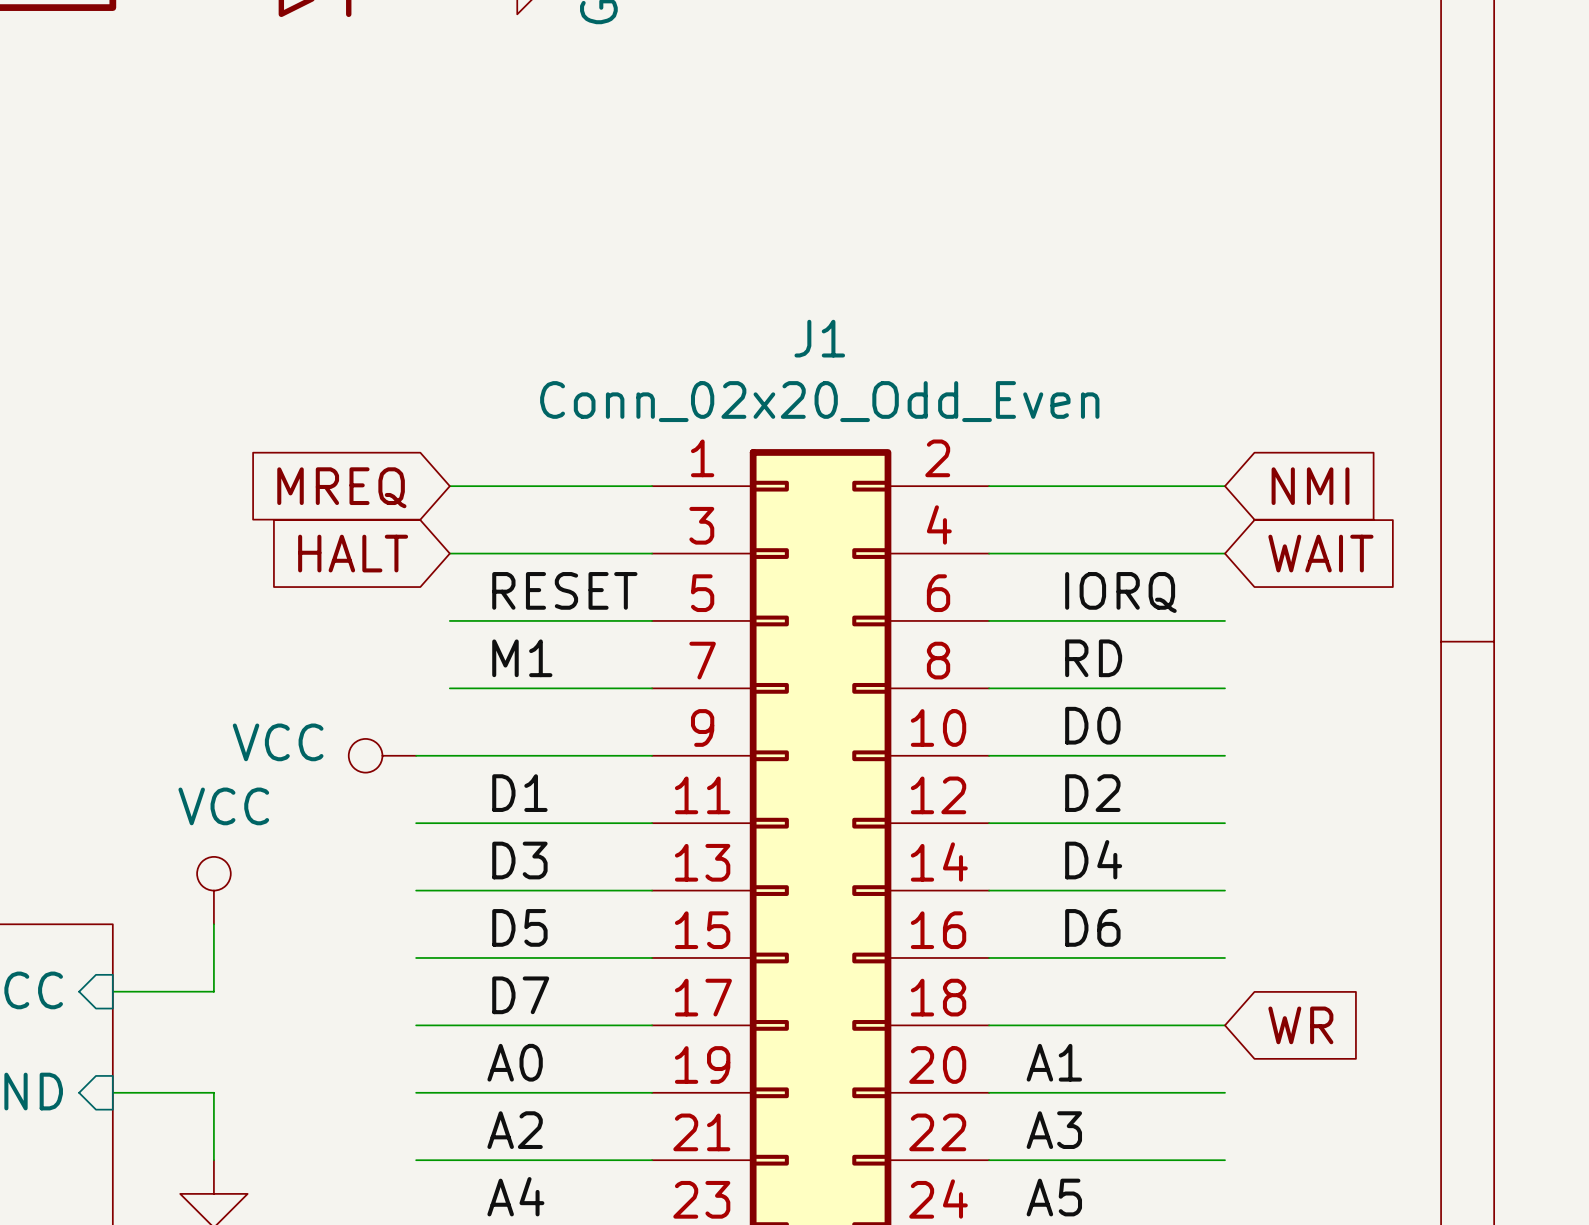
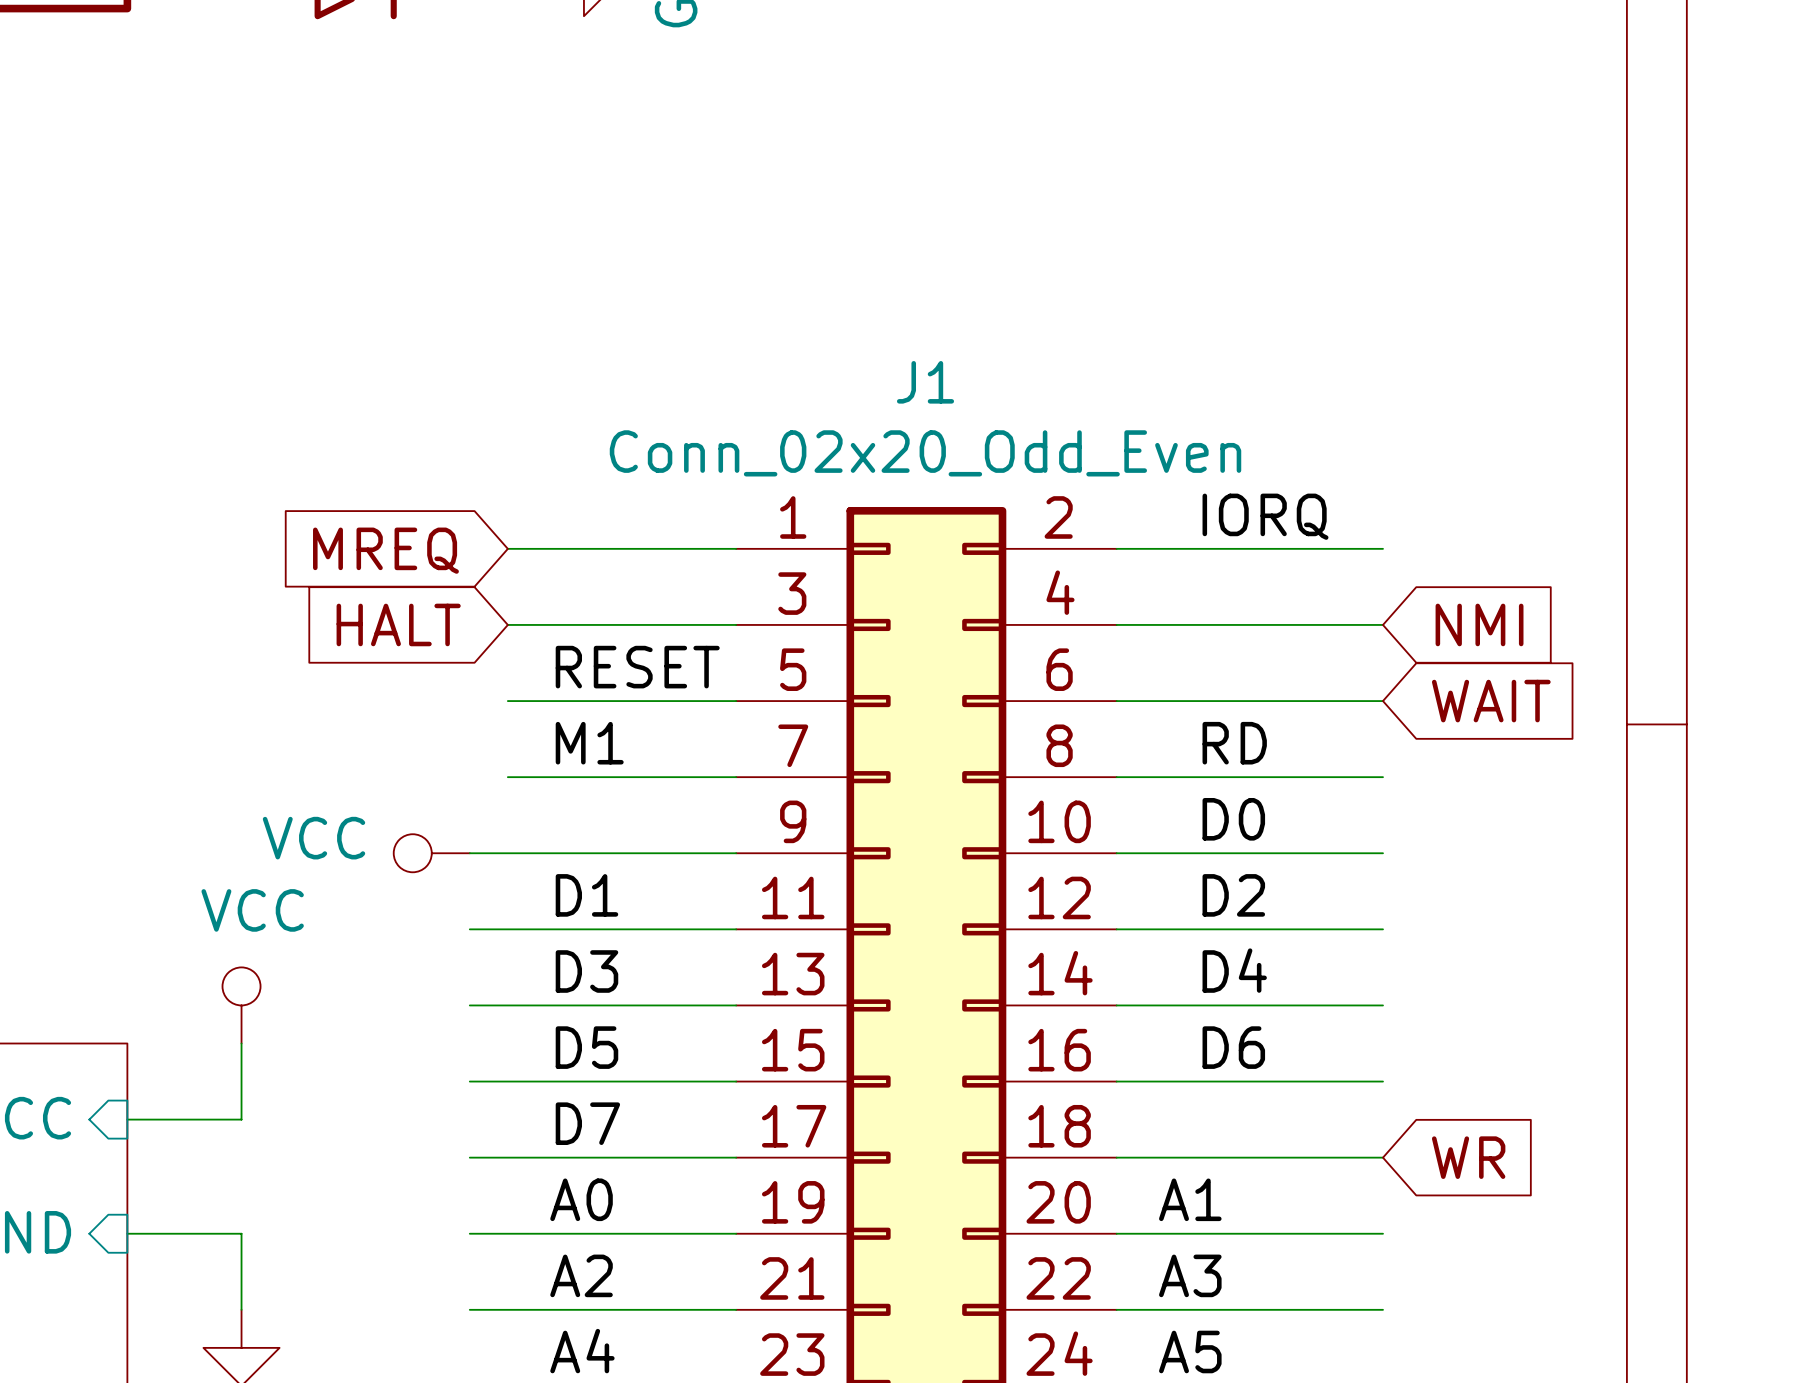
global label: NMI (1310, 486) -> none
global label: WAIT (1320, 553) -> NMI (1479, 624)
label position: IORQ (1120, 592) -> IORQ (1265, 516)
global label: none -> WAIT (1491, 701)

